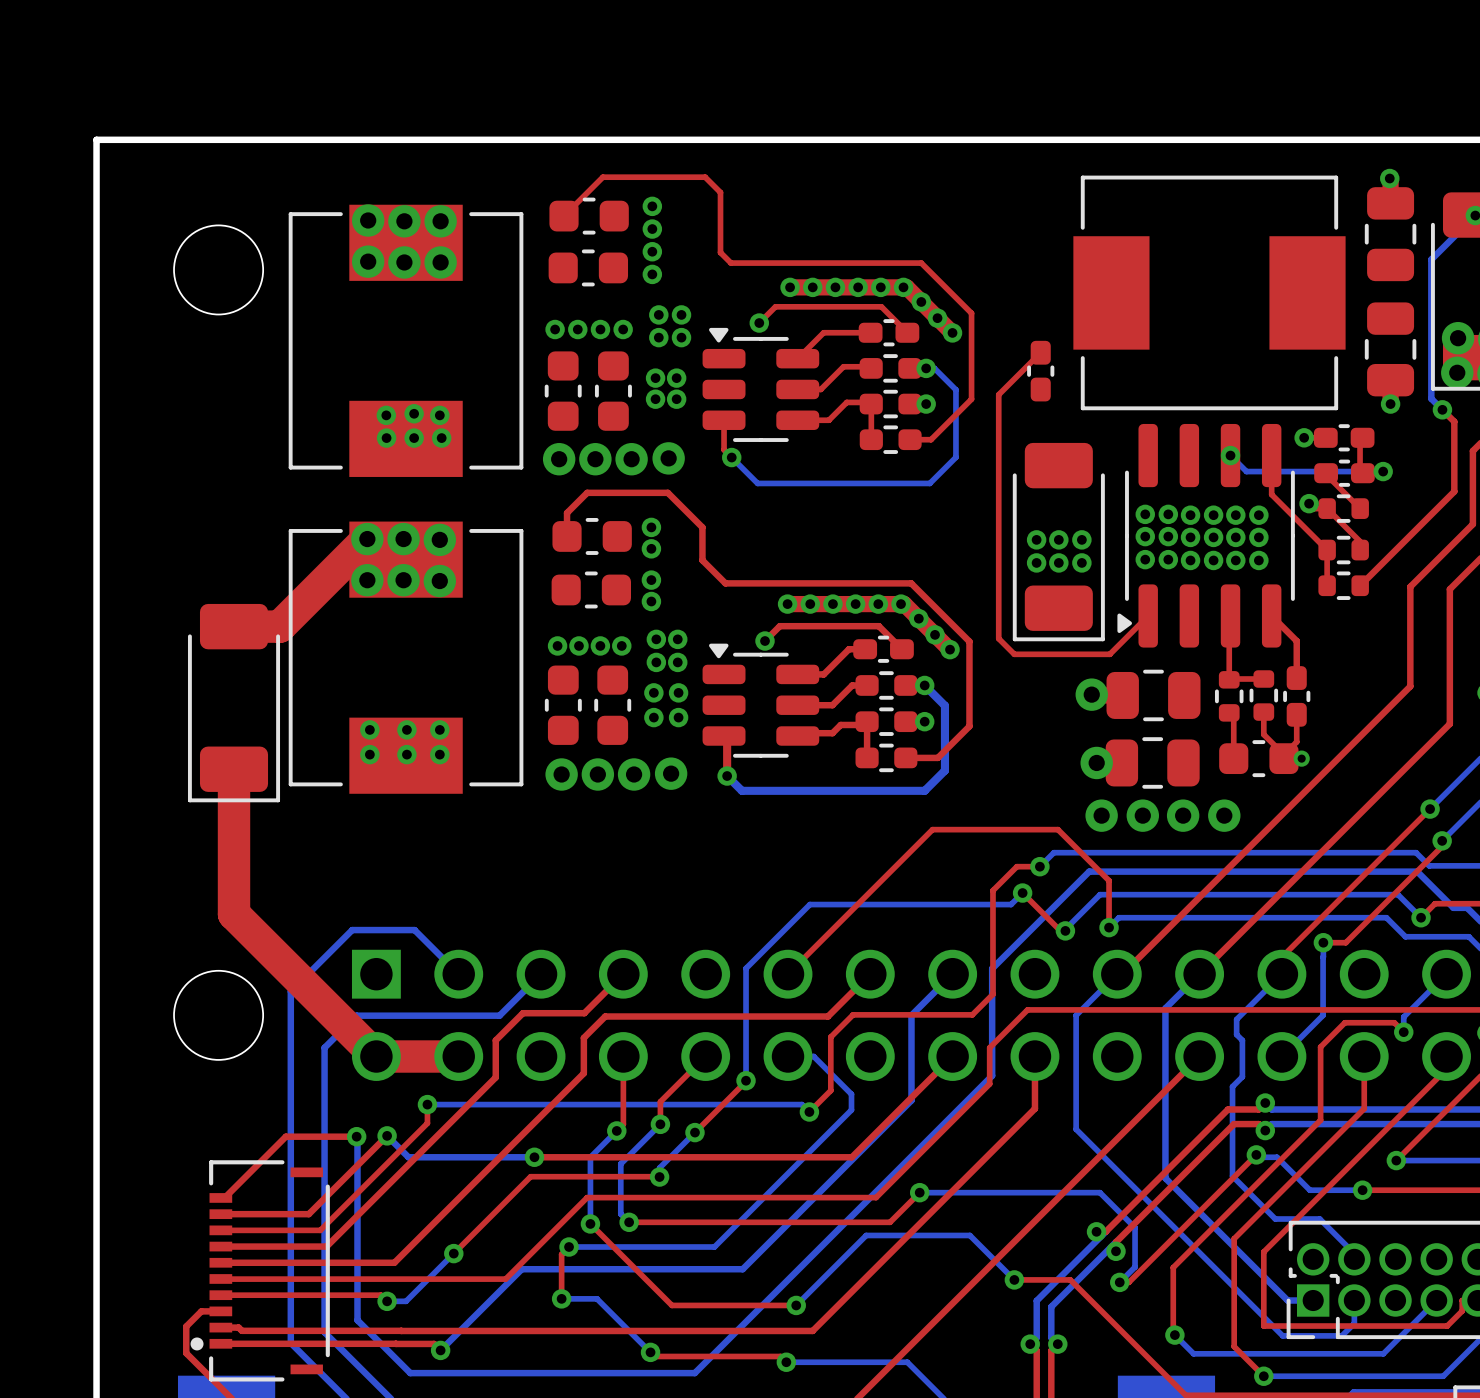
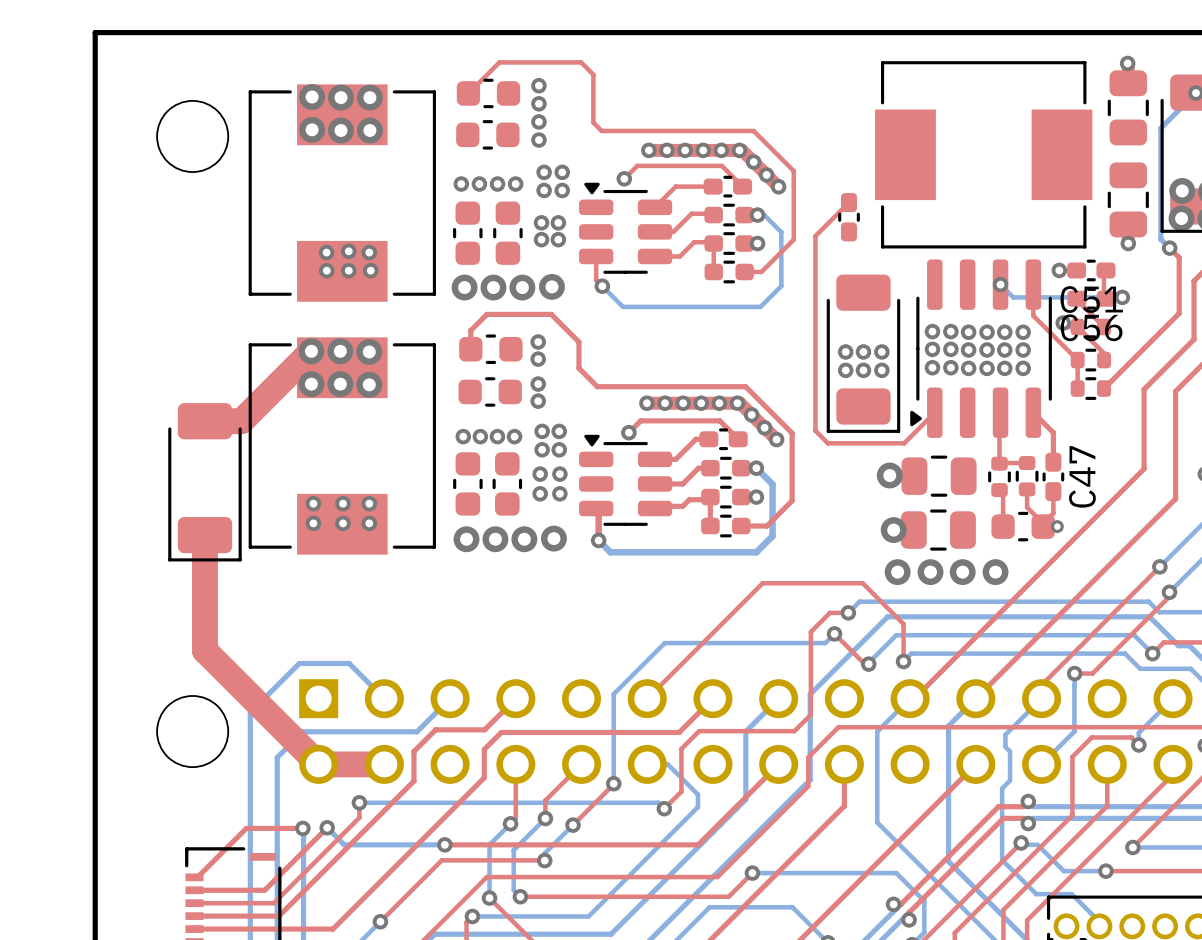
C51 name: none -> C51 (1091, 299)
C56 name: none -> C56 (1091, 327)
C47 name: none -> C47 (1082, 476)

